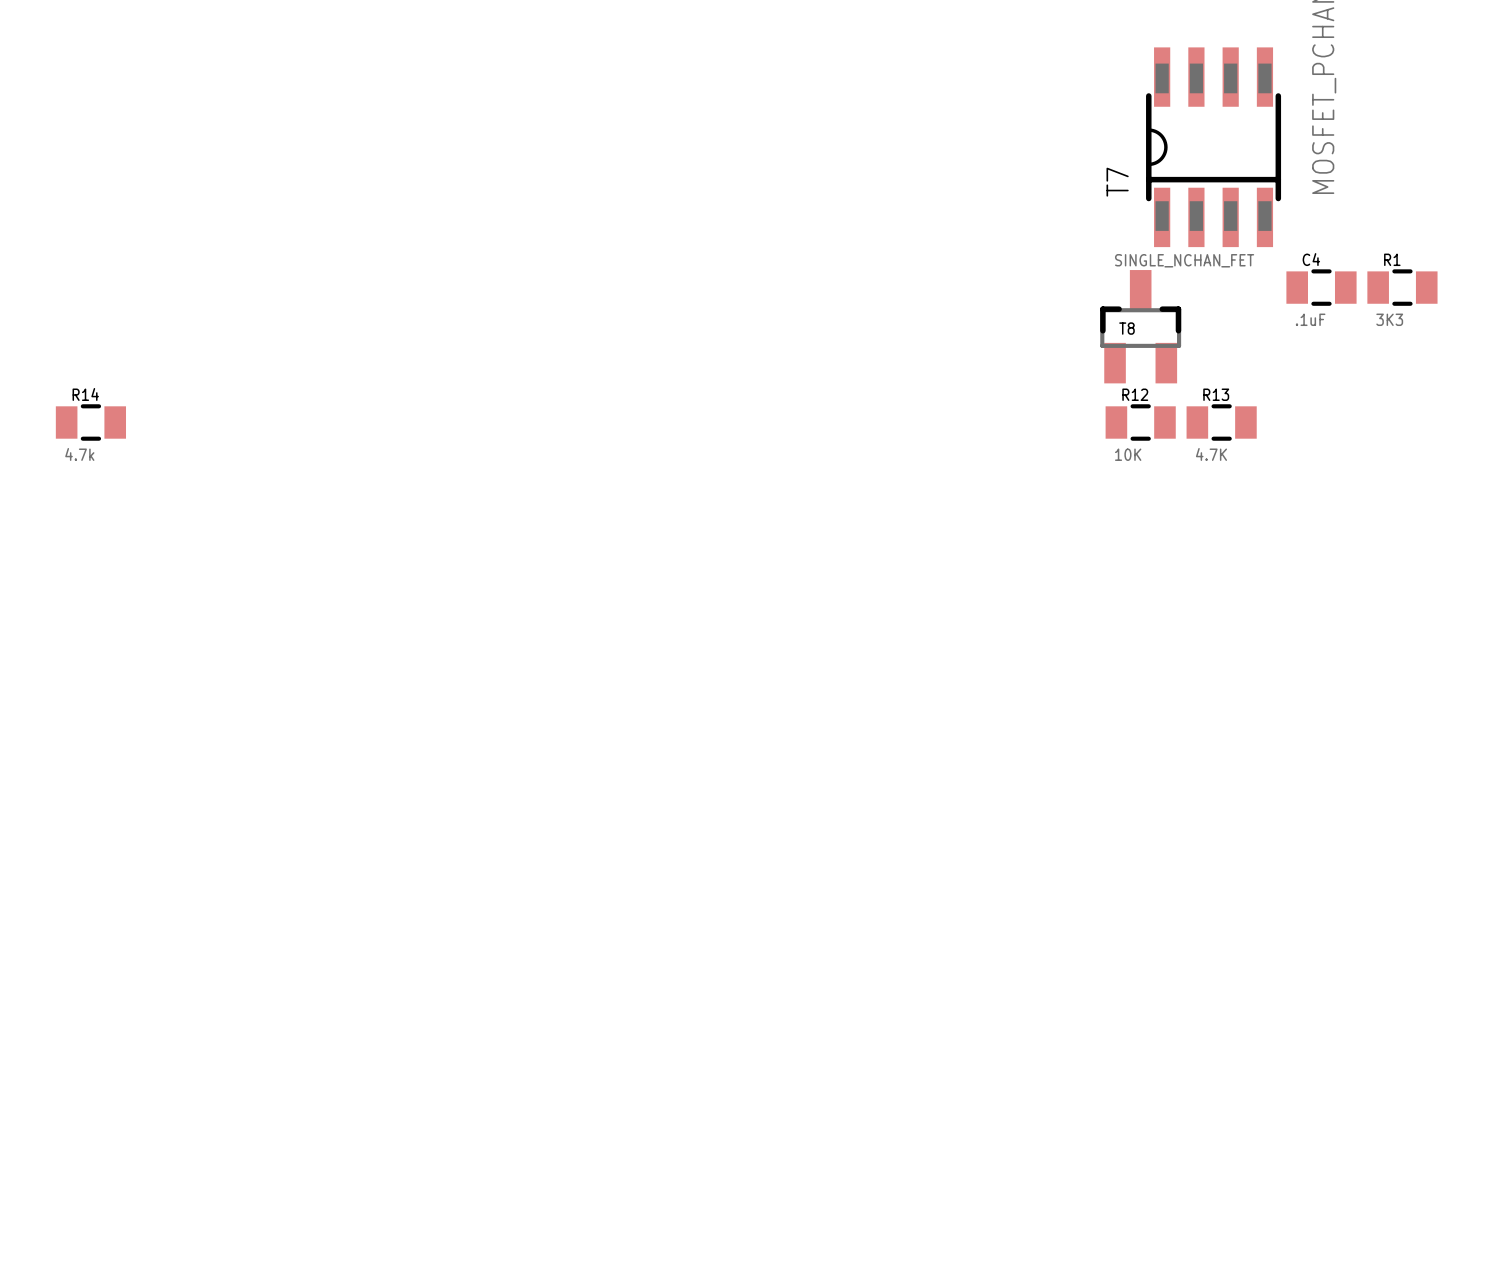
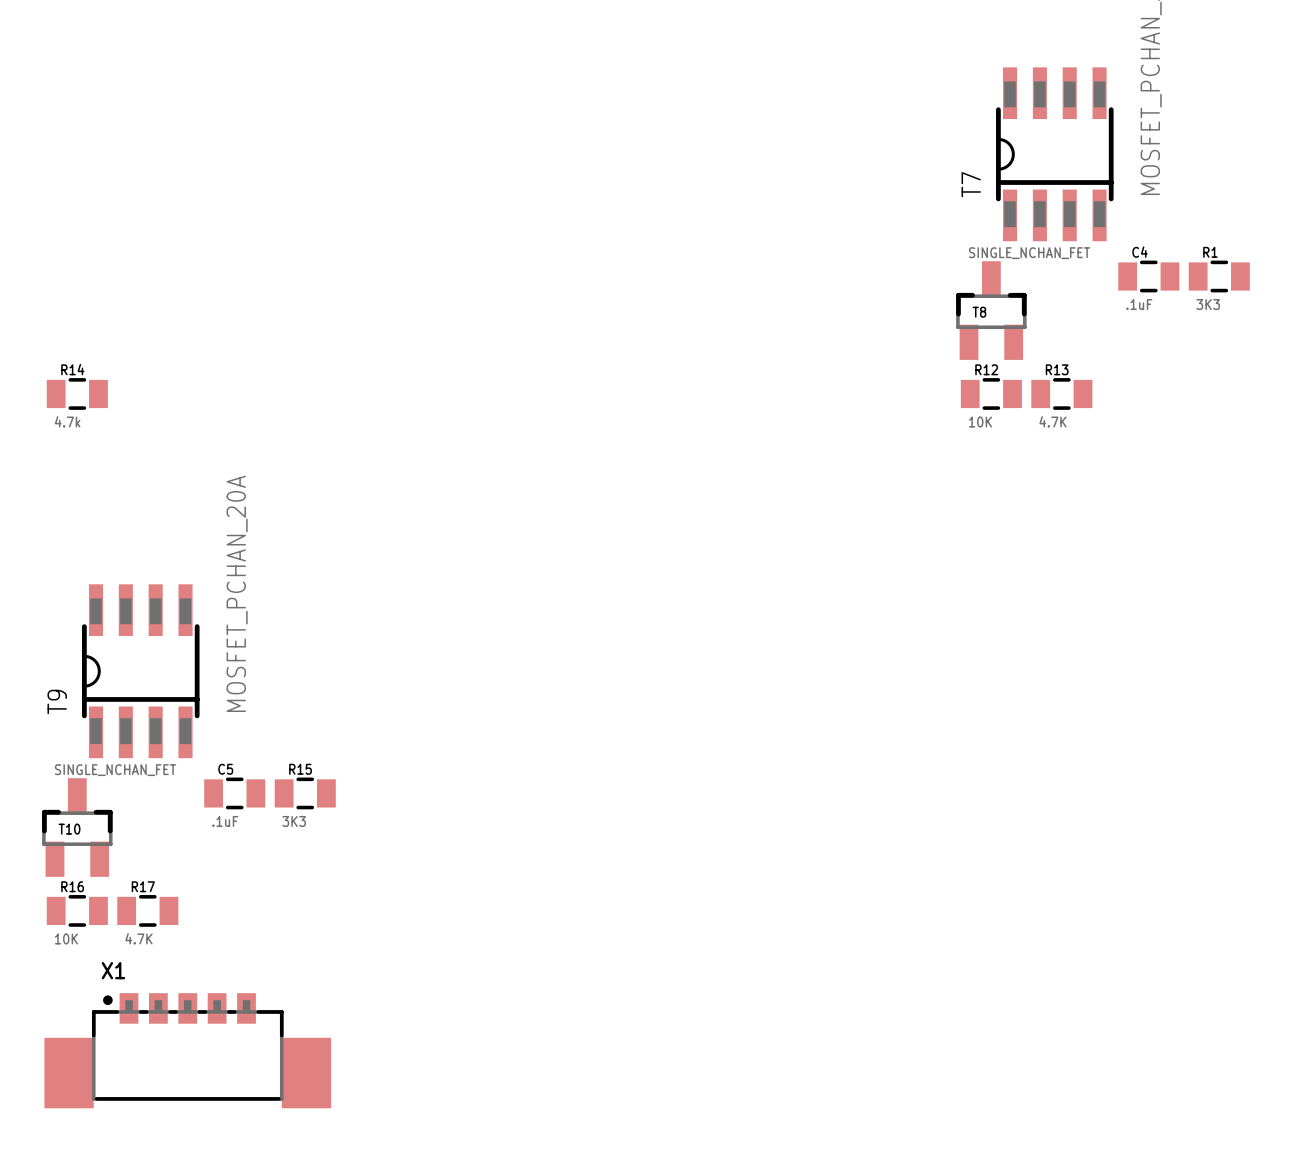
T9: none -> MOSFET_PCHAN_20A (140, 671)
C5: none -> .1uF (234, 793)
R15: none -> 3K3 (305, 793)
T10: none -> SINGLE_NCHAN_FET (77, 827)
R16: none -> 10K (77, 910)
R17: none -> 4.7K (147, 910)
X1: none -> (187, 1050)

